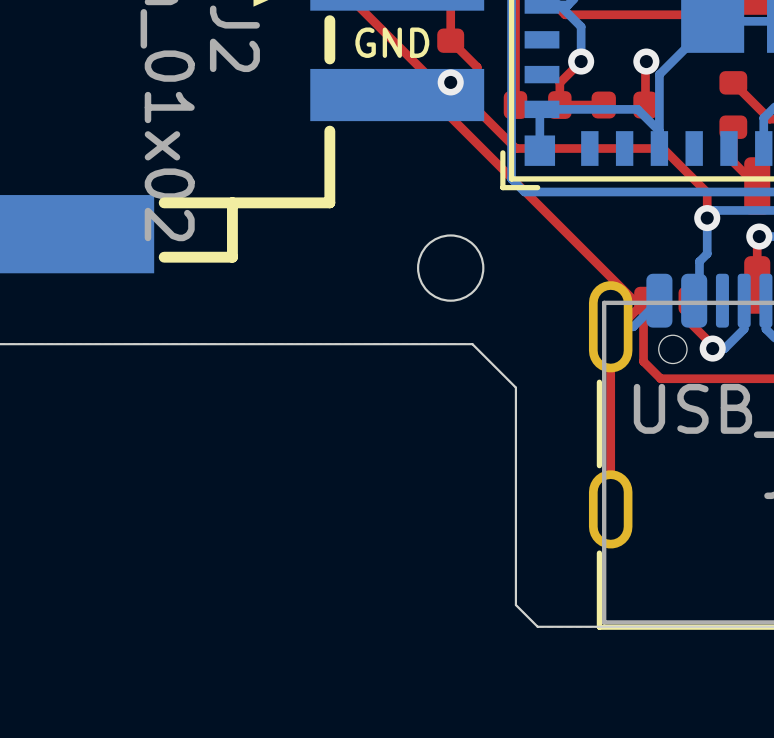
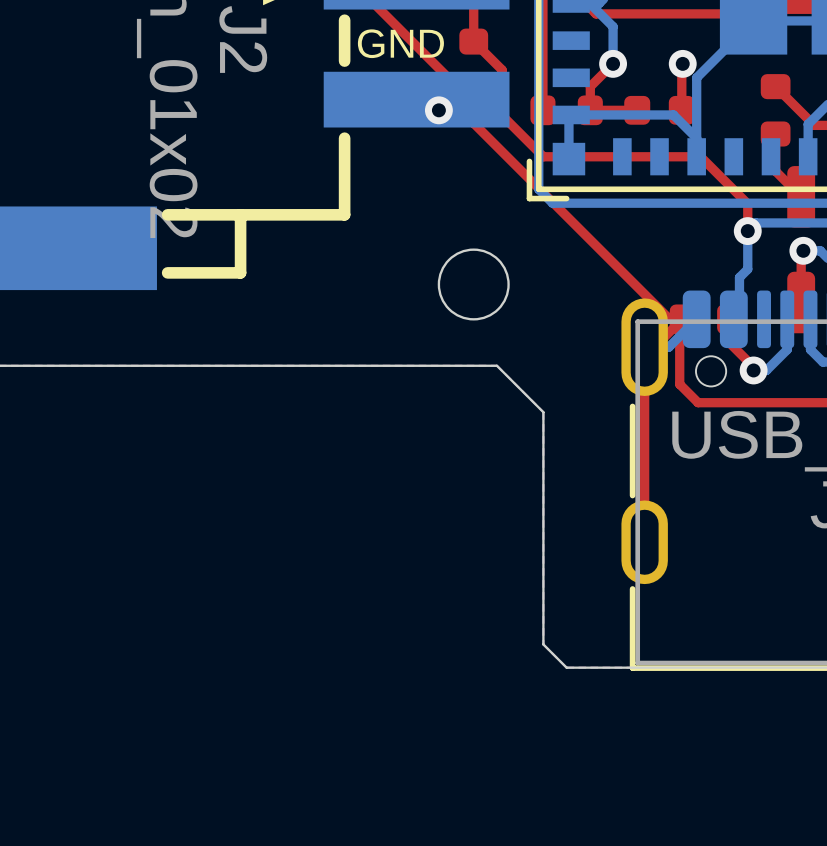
via position: (450, 82) -> (438, 110)

